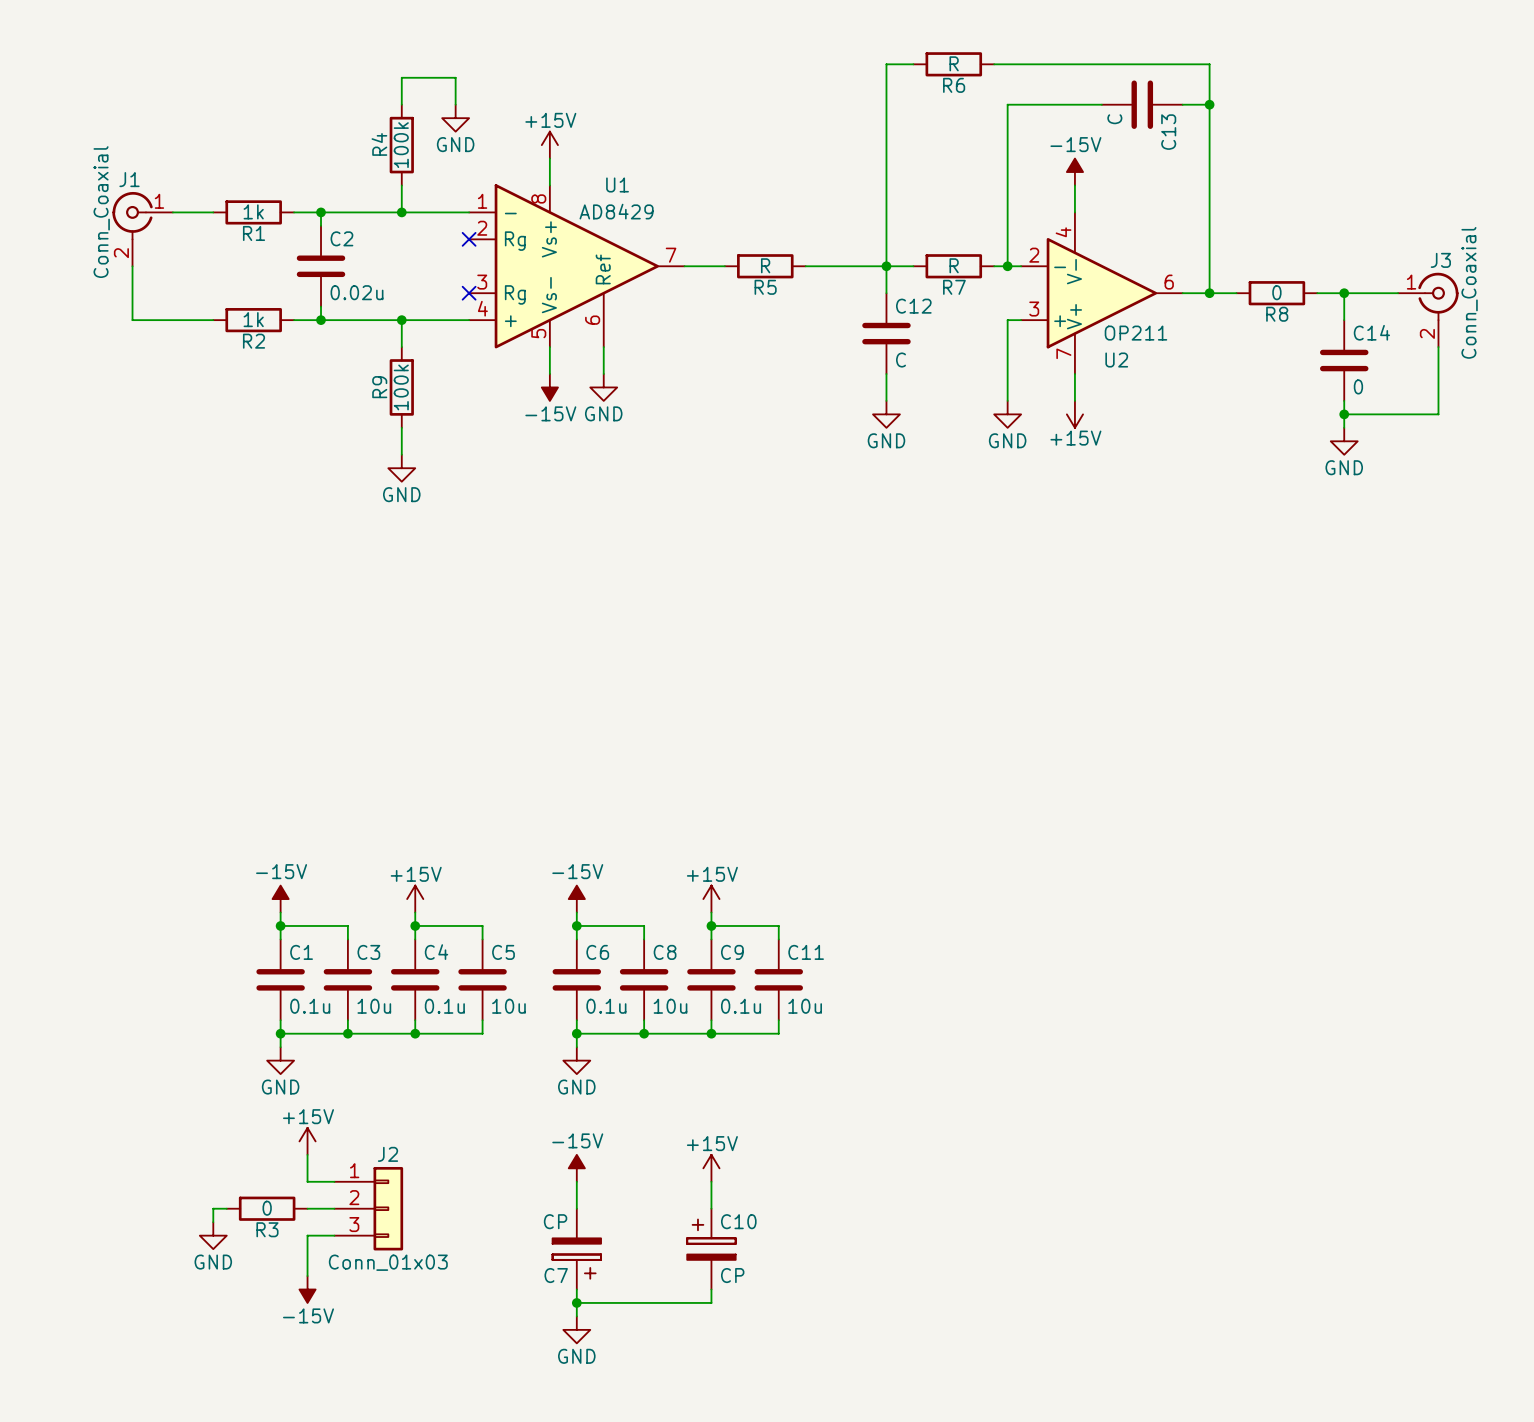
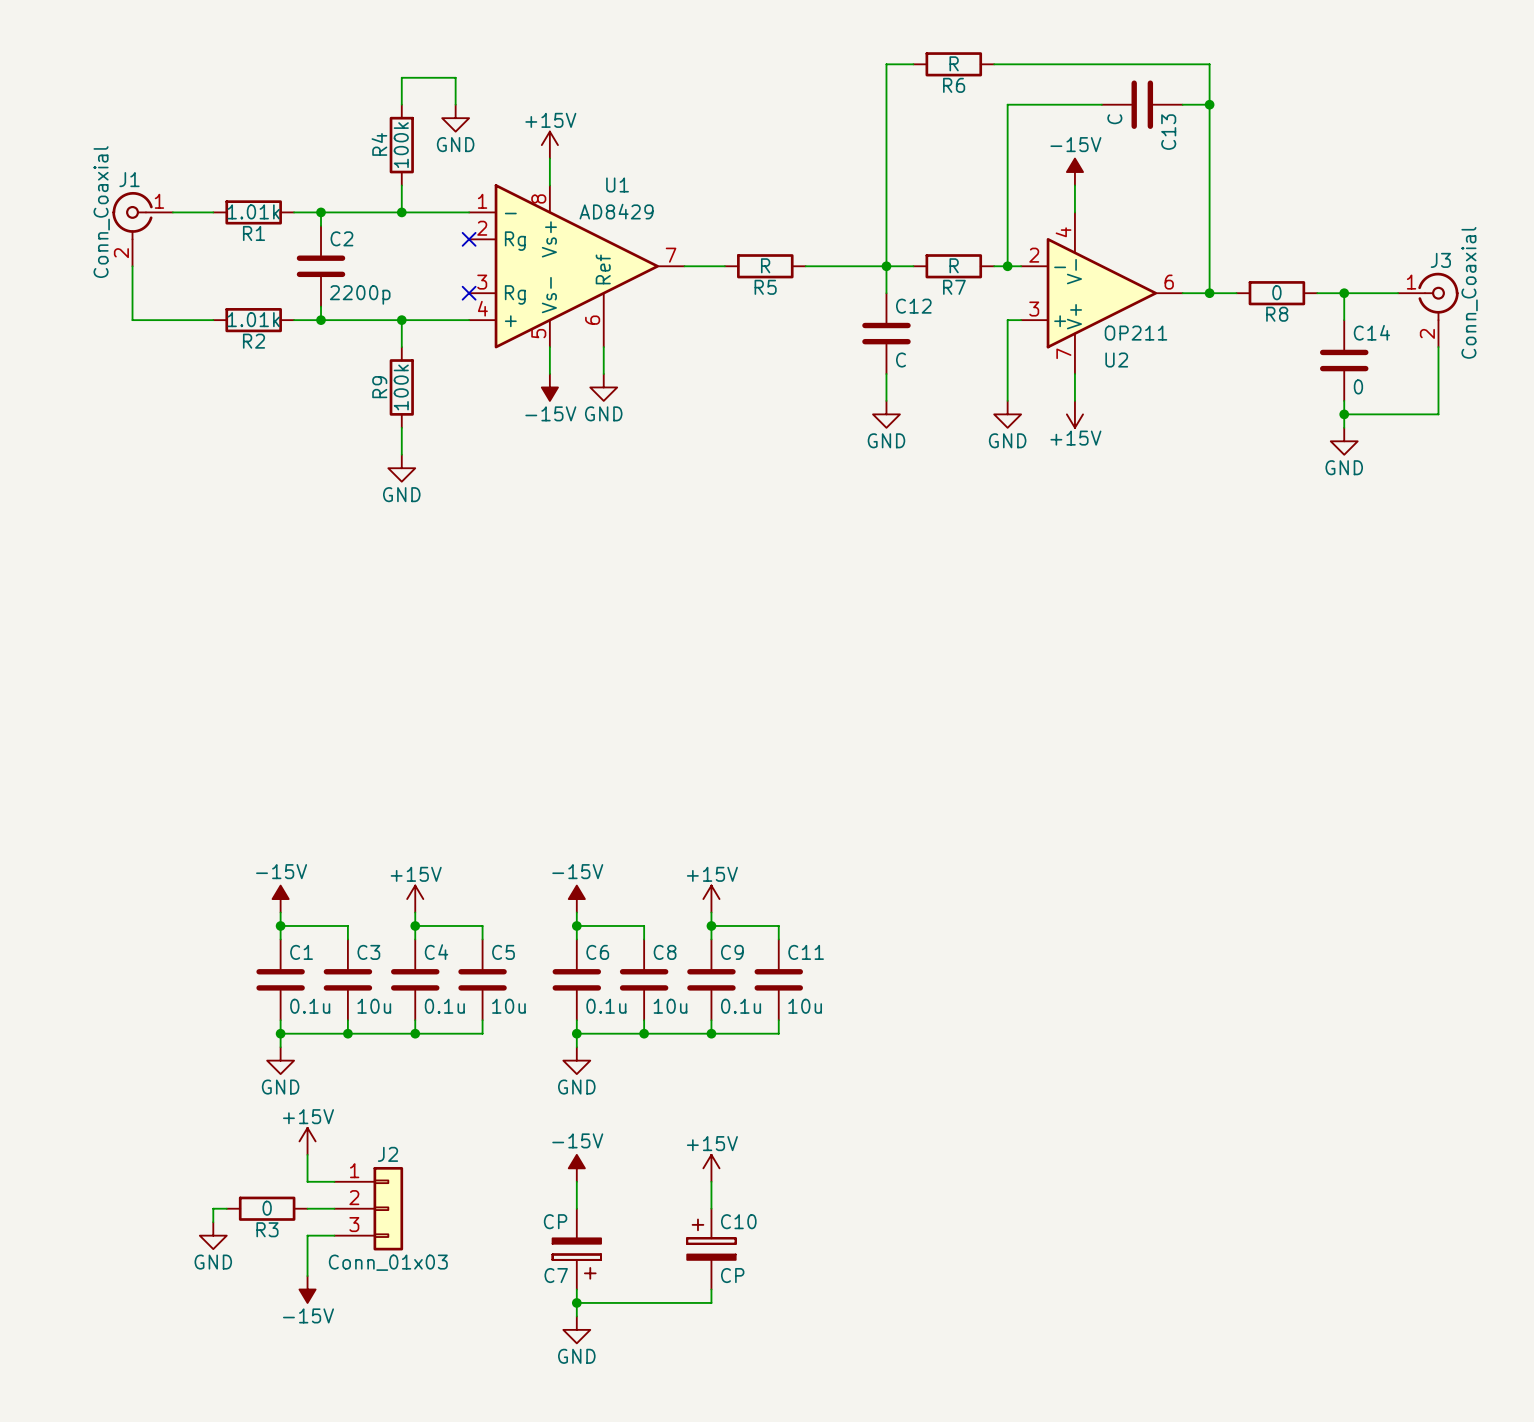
R1 value: 1k (253, 211) -> 1.01k (253, 211)
C2 value: 0.02u (357, 292) -> 2200p (360, 294)
R2 value: 1k (253, 319) -> 1.01k (253, 319)

